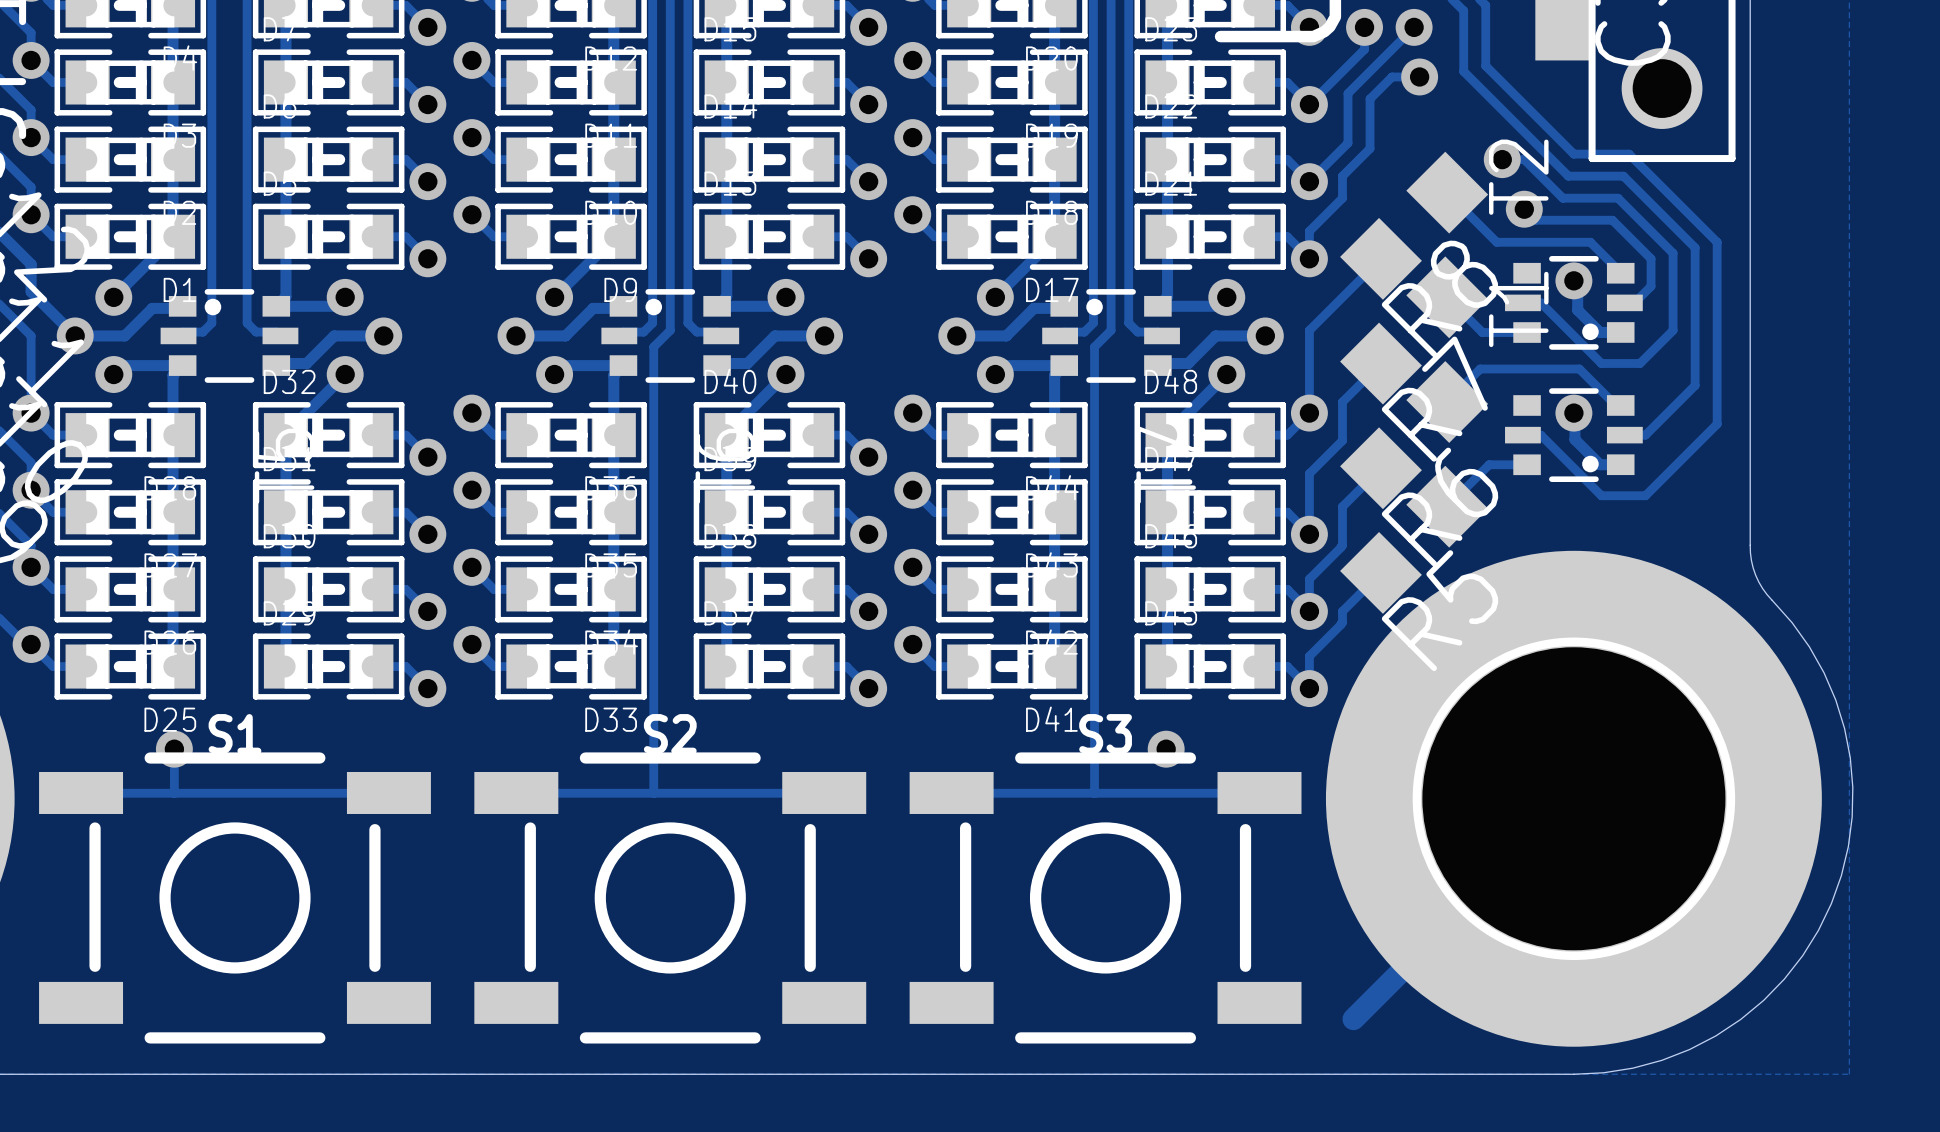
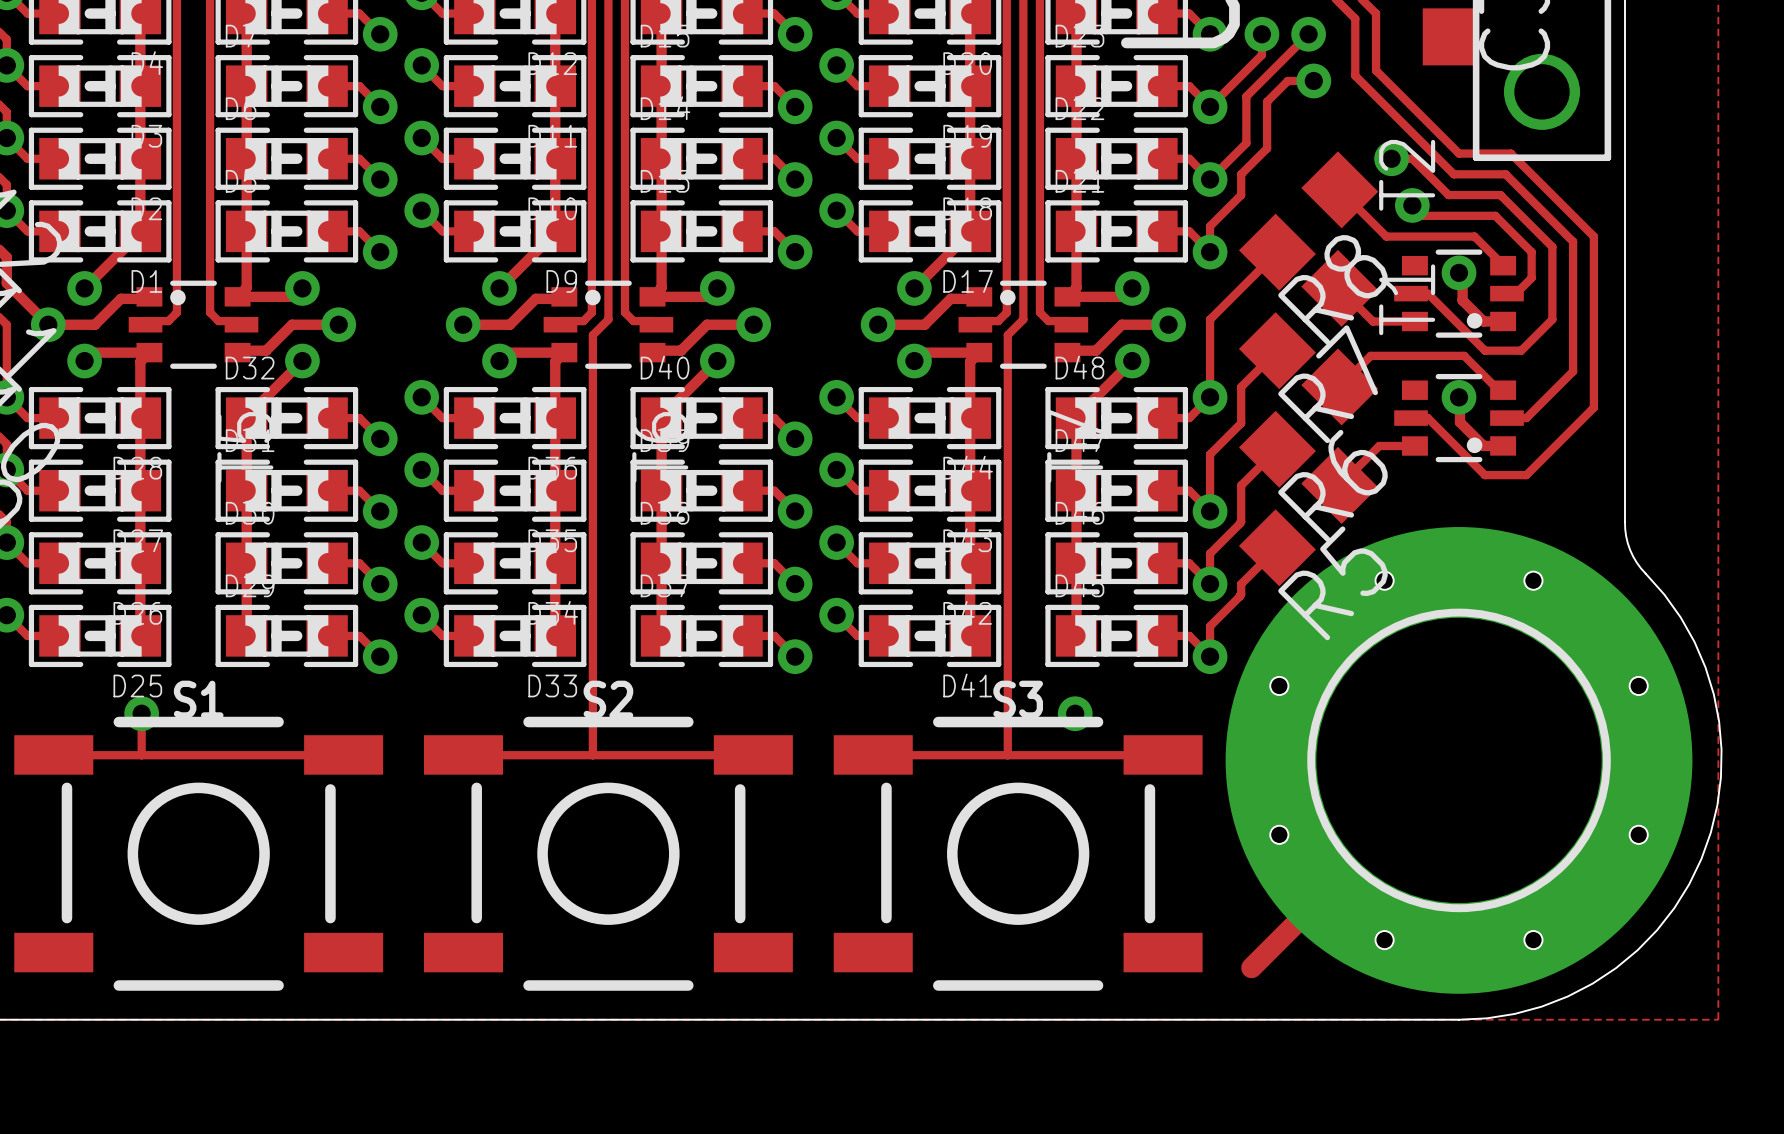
hole: none -> (1384, 580)
hole: none -> (1533, 580)
hole: none -> (1279, 685)
hole: none -> (1638, 685)
hole: none -> (1279, 834)
hole: none -> (1638, 834)
hole: none -> (1384, 940)
hole: none -> (1533, 940)

